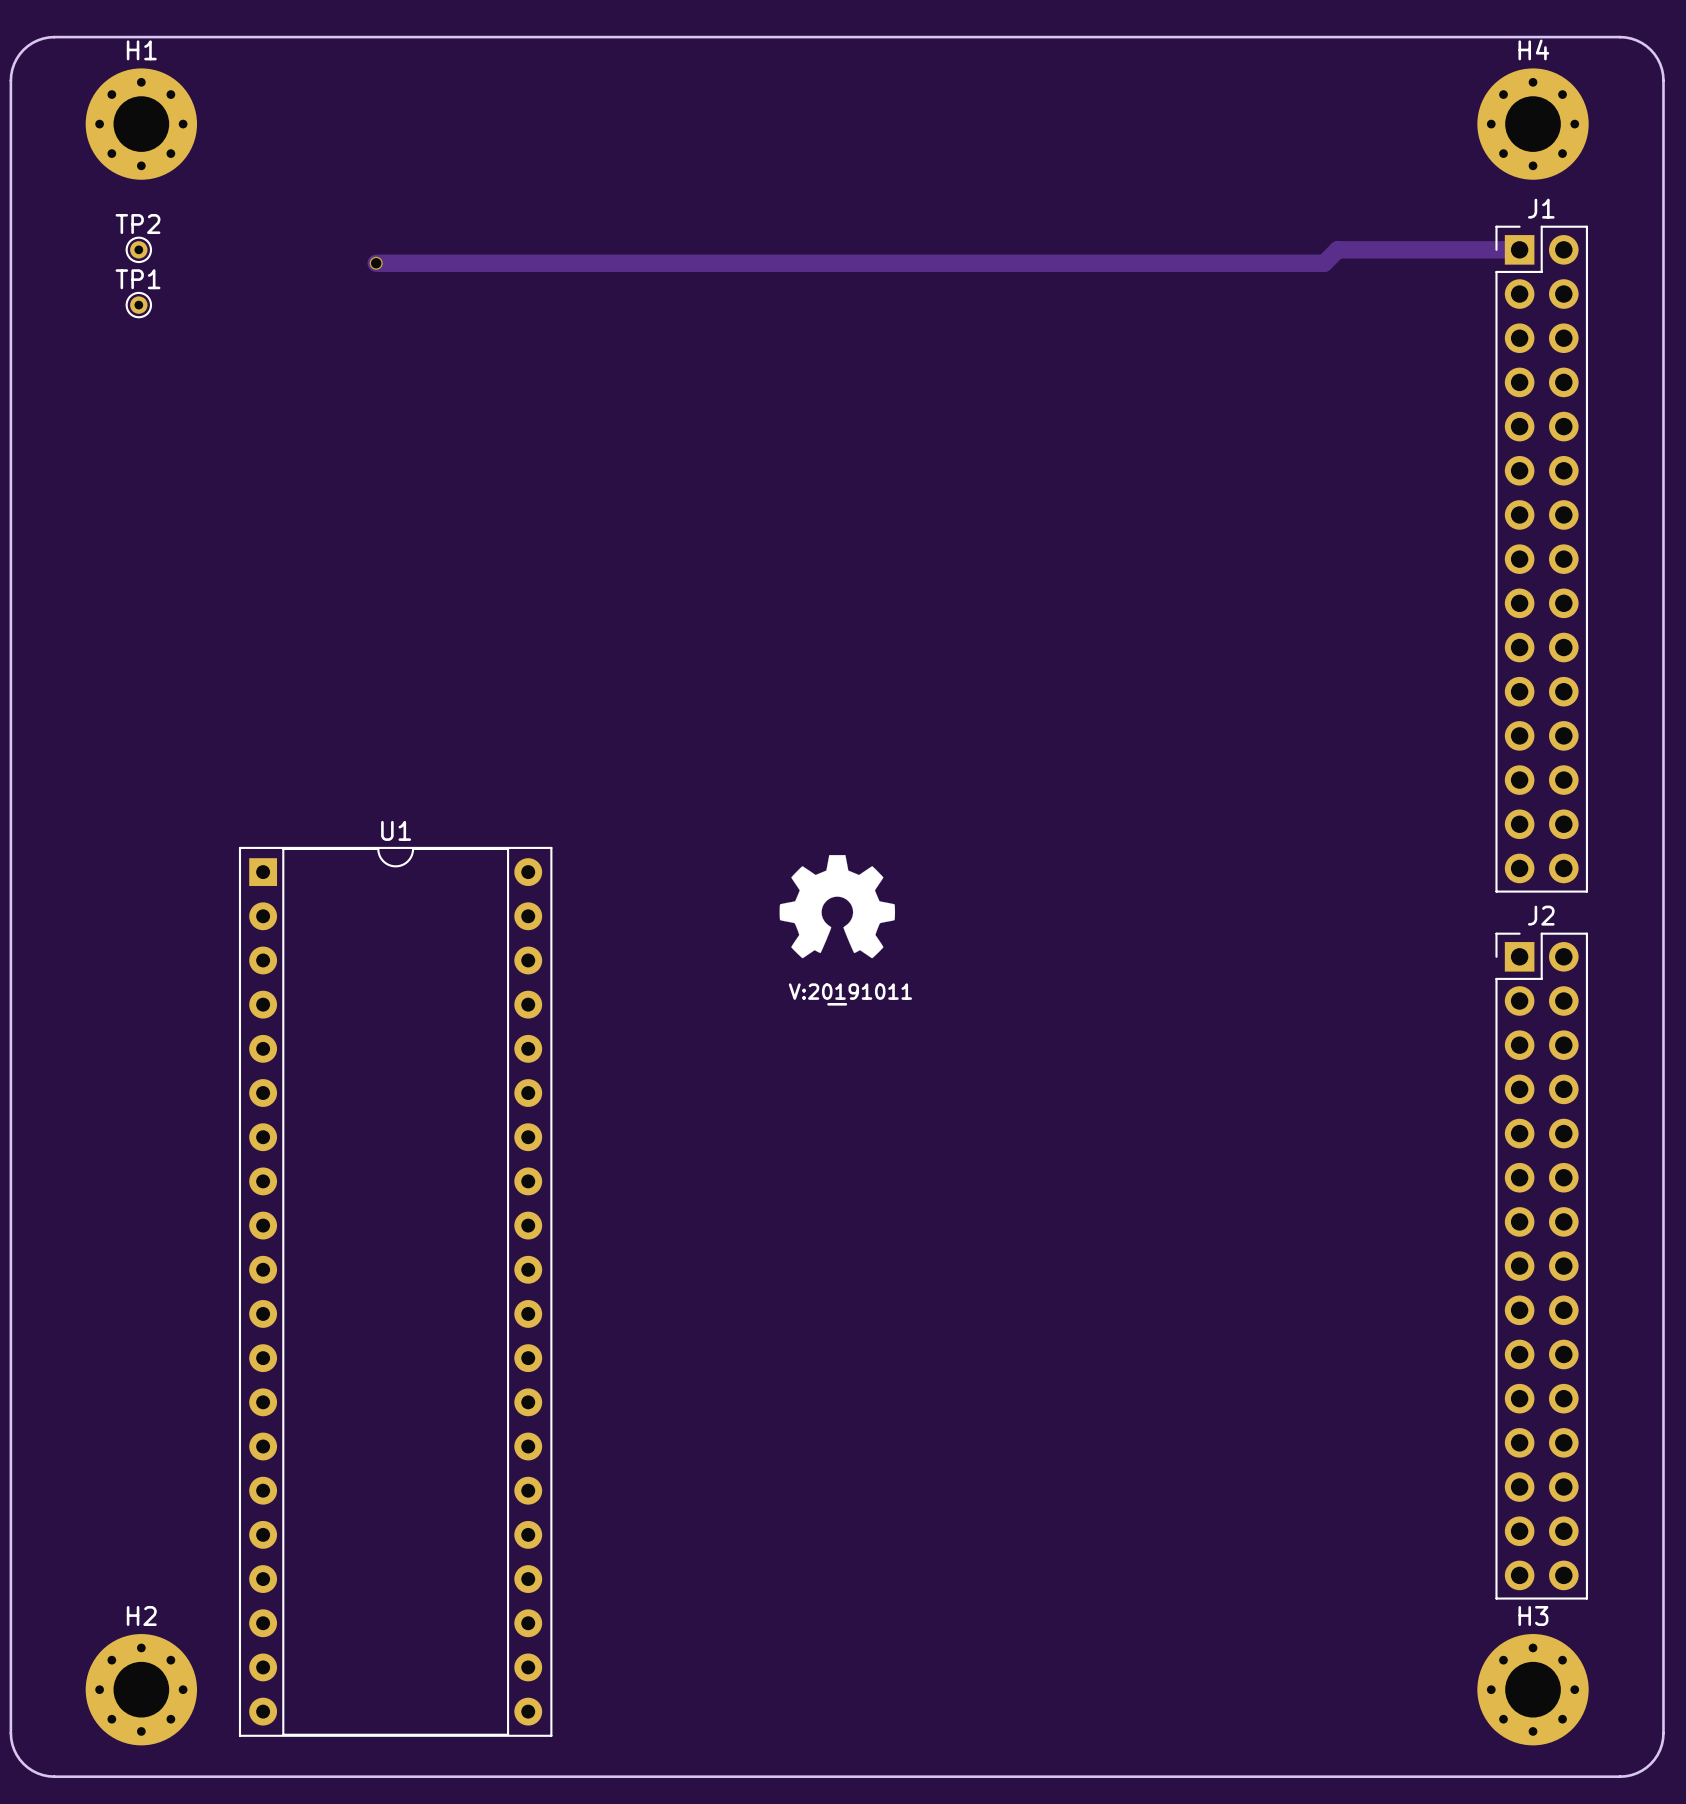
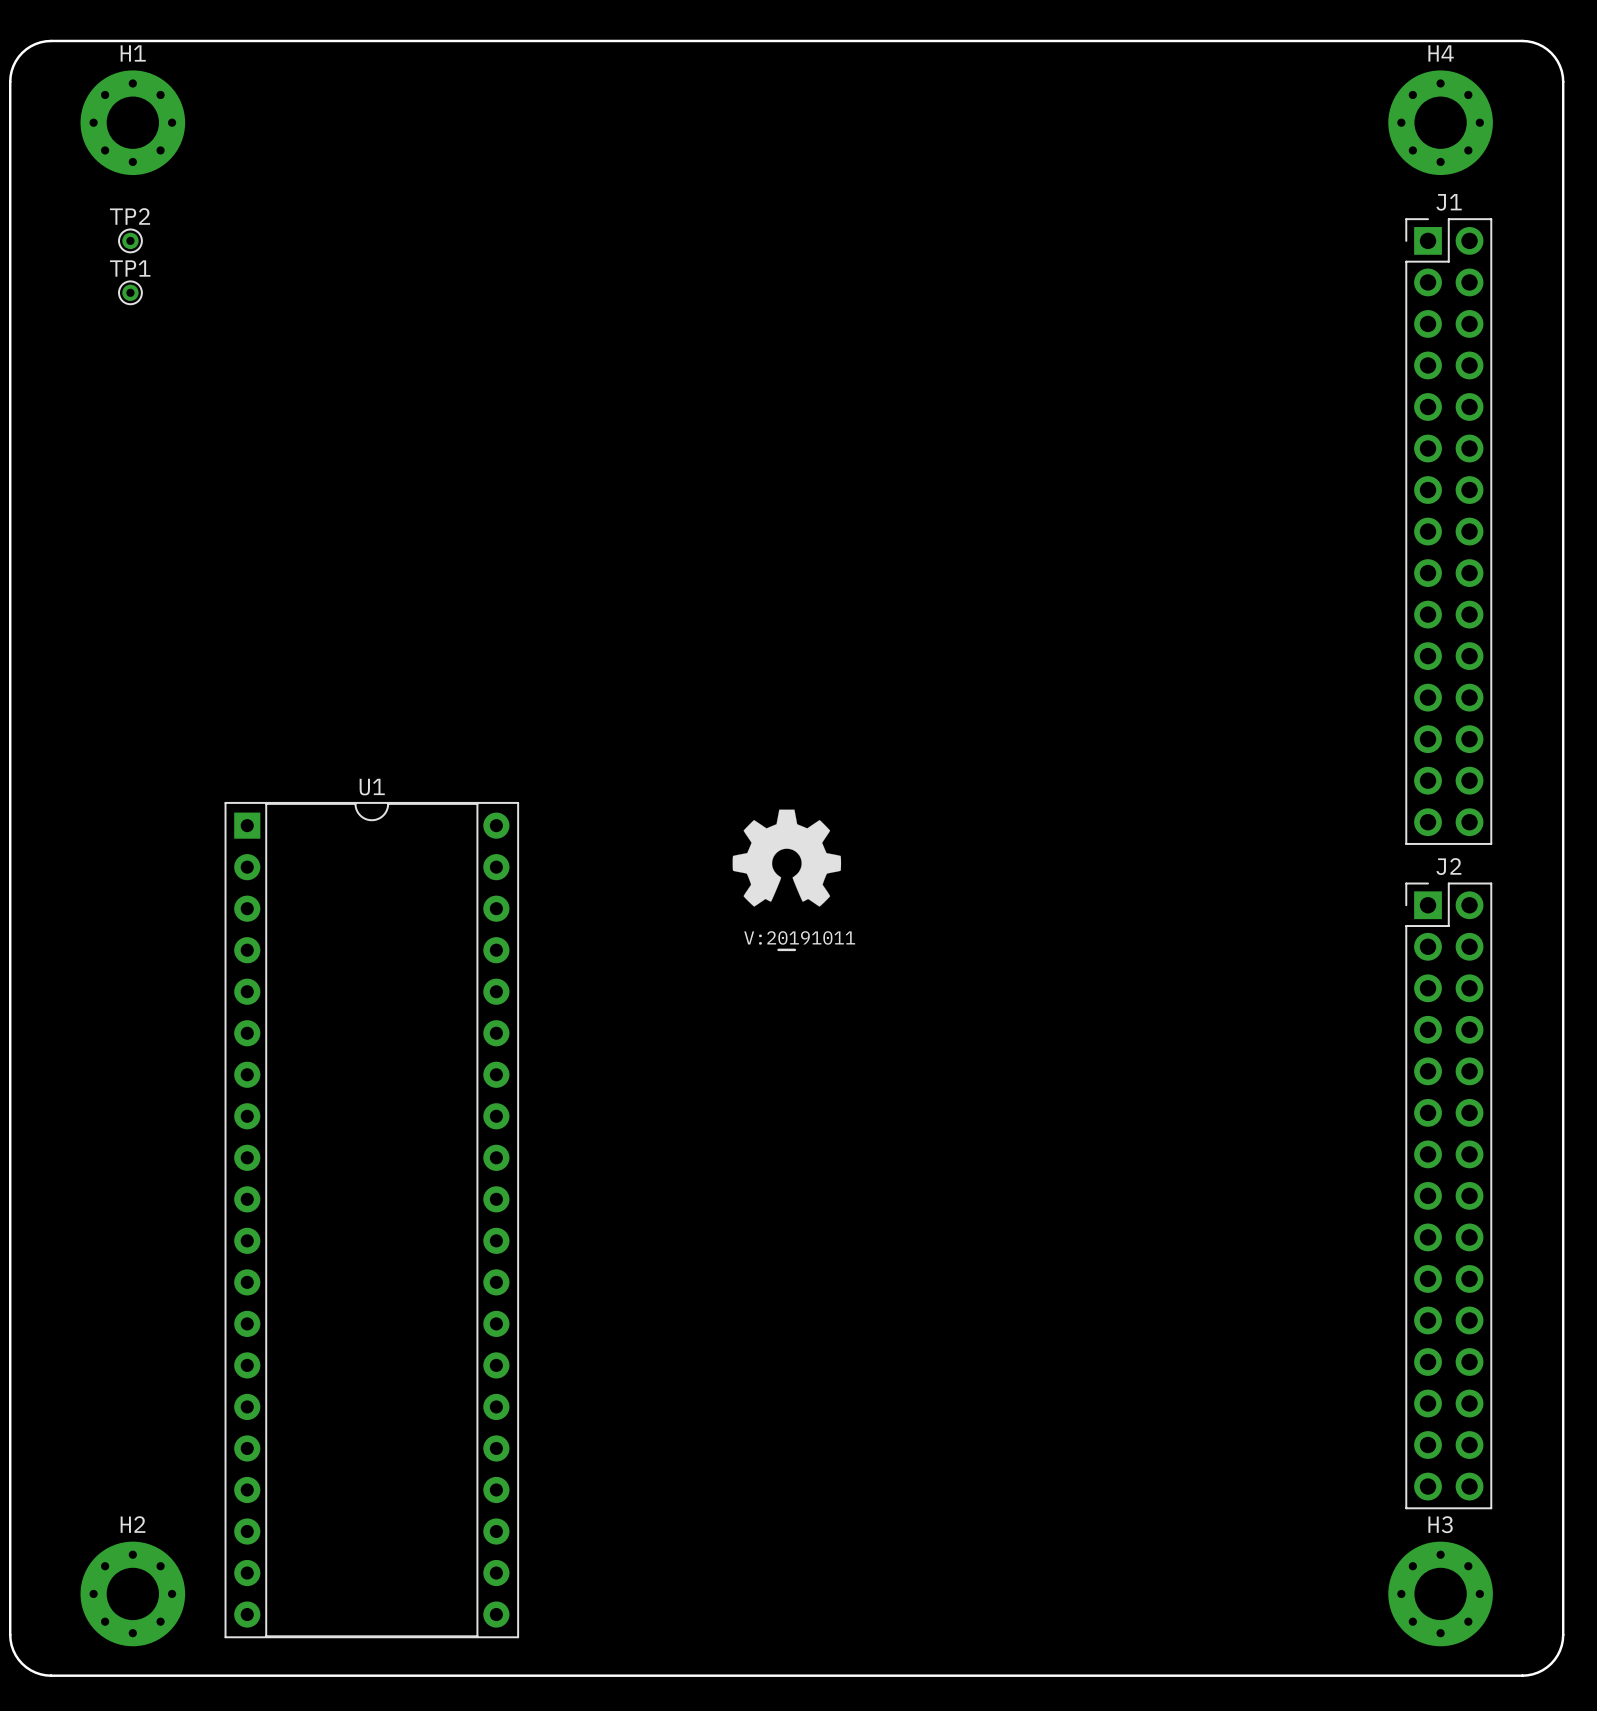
track: (1519, 249) (1337, 249) (1324, 263) (376, 263) -> none
via: (376, 263) -> none

